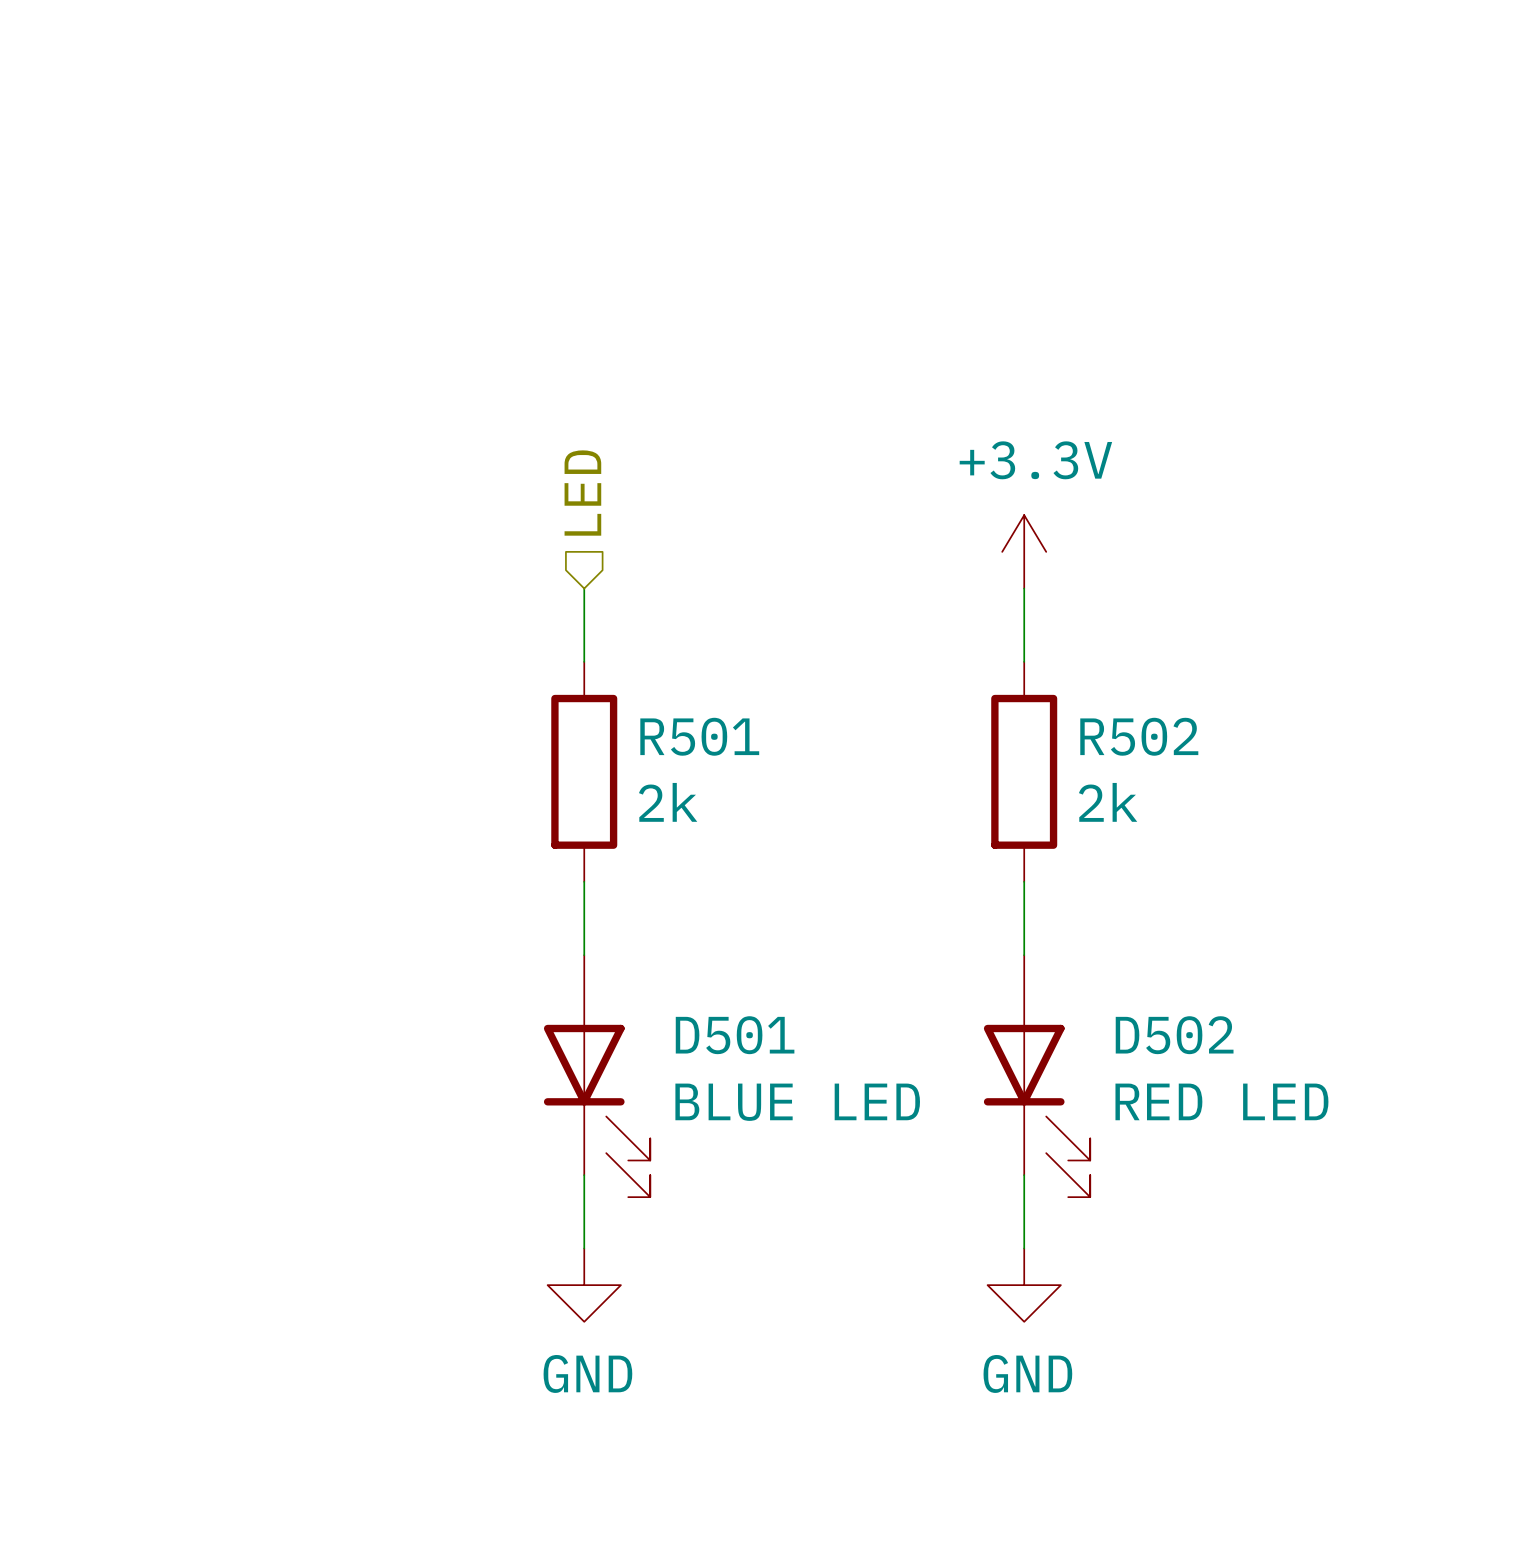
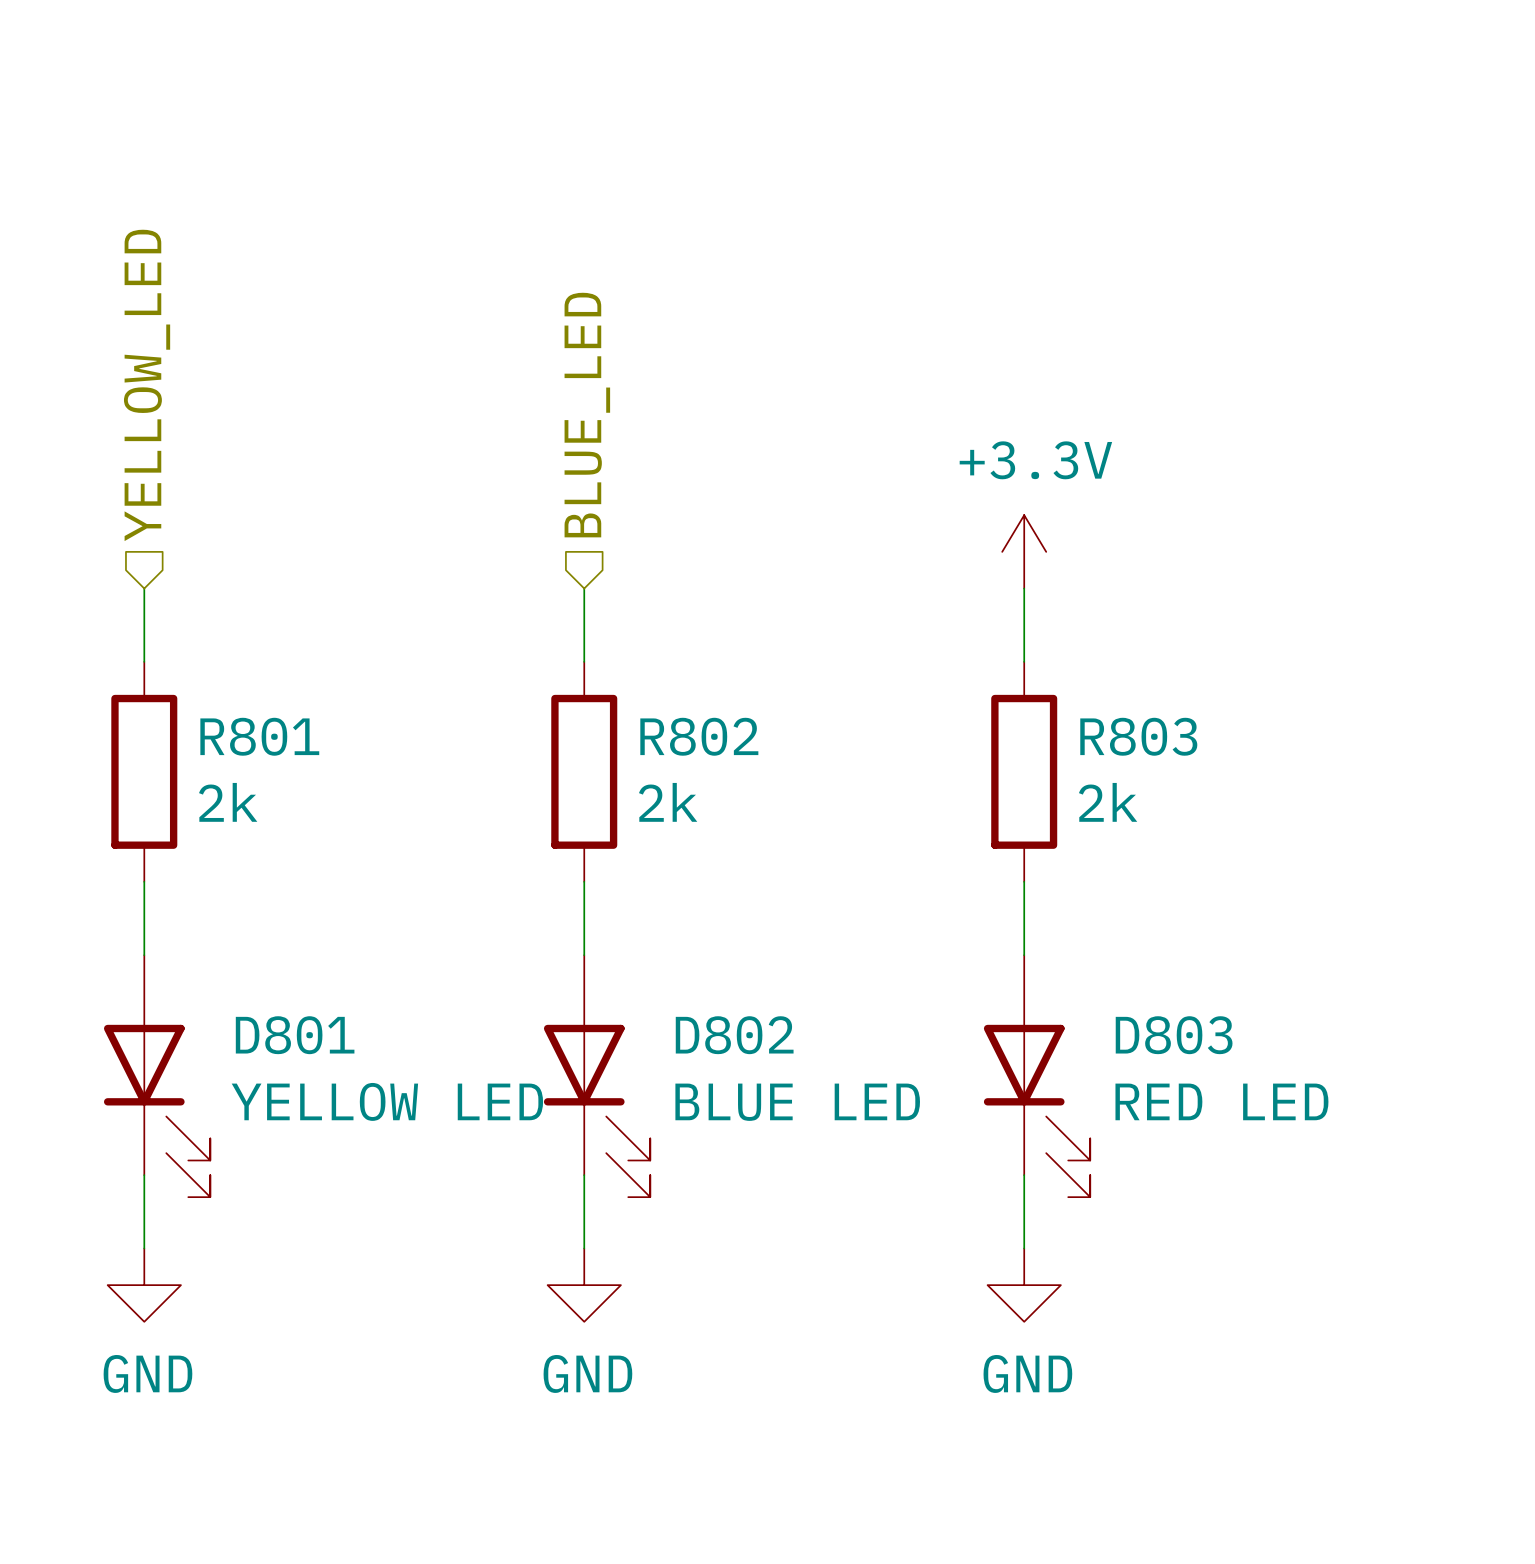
hierarchical label: none -> YELLOW_LED (147, 385)
hierarchical label: LED (582, 493) -> BLUE_LED (587, 415)
wire: none -> (144, 588) (144, 661)
R501 name: R501 (699, 736) -> R802 (699, 736)
R502 name: R502 (1139, 736) -> R803 (1138, 736)
R801: none -> 2k (144, 771)
wire: none -> (144, 881) (144, 955)
D501 name: D501 (735, 1035) -> D802 (734, 1035)
D502 name: D502 (1174, 1035) -> D803 (1174, 1035)
D801: none -> YELLOW LED (157, 1076)
wire: none -> (144, 1175) (144, 1248)
power symbol: none -> GND (144, 1285)

